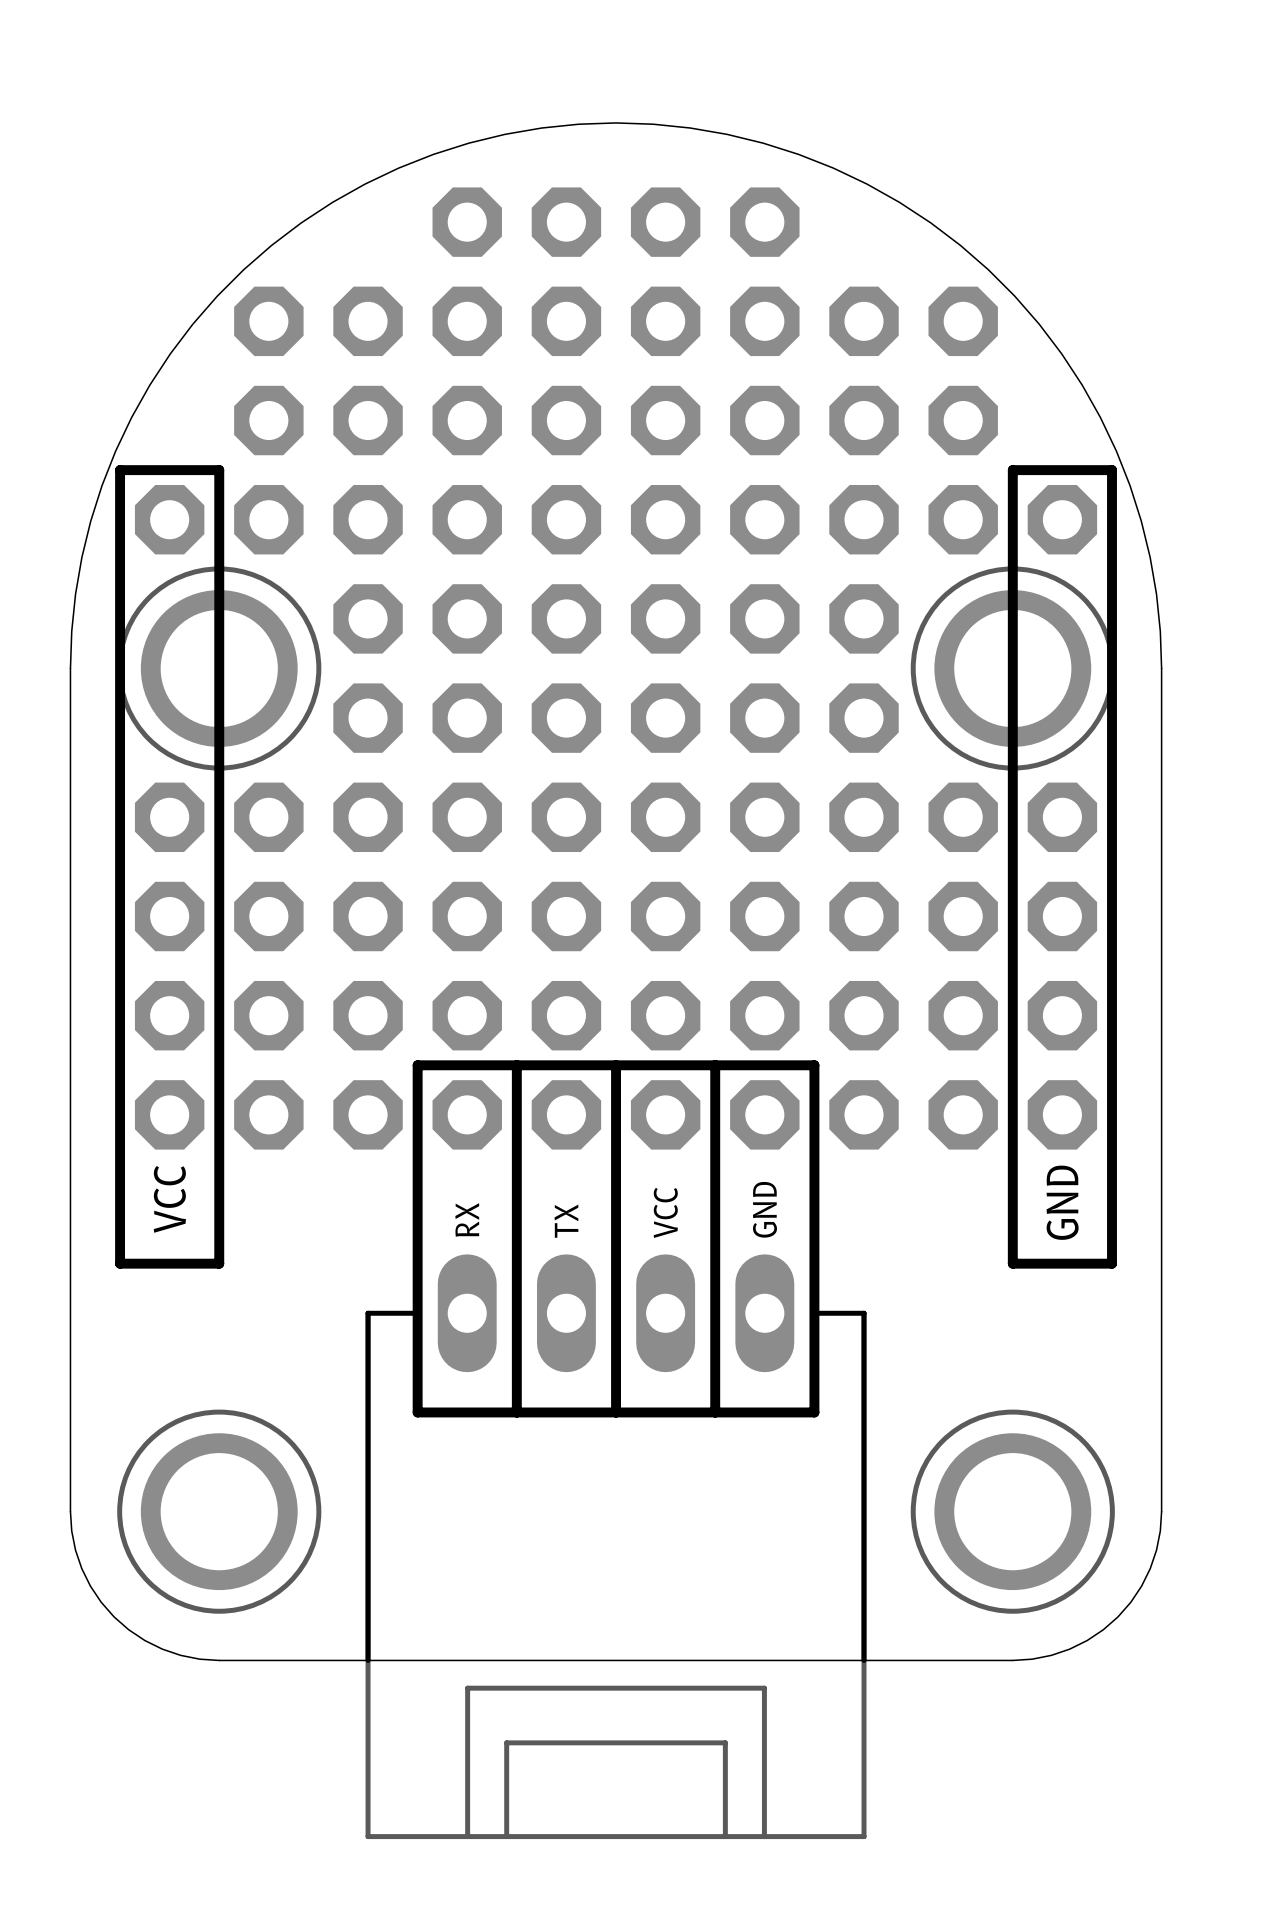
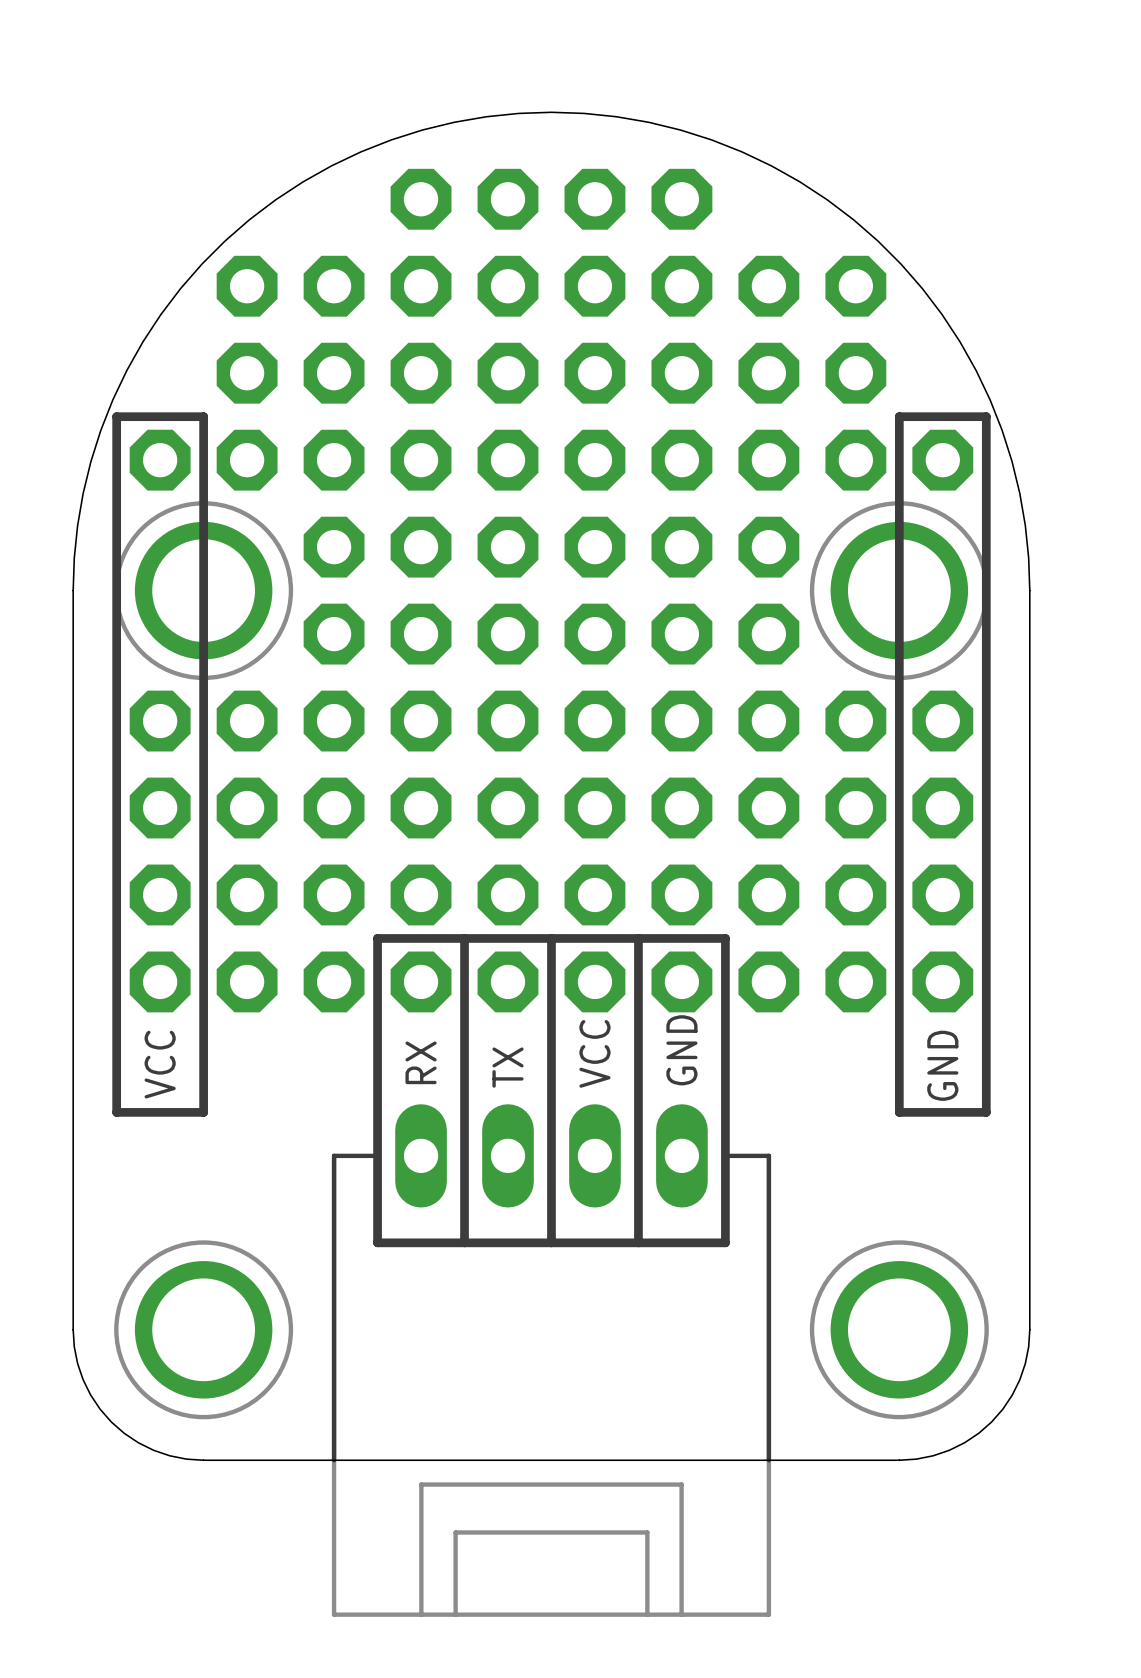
part footprint: [70, 122, 1162, 1840] -> [73, 112, 1030, 1617]

